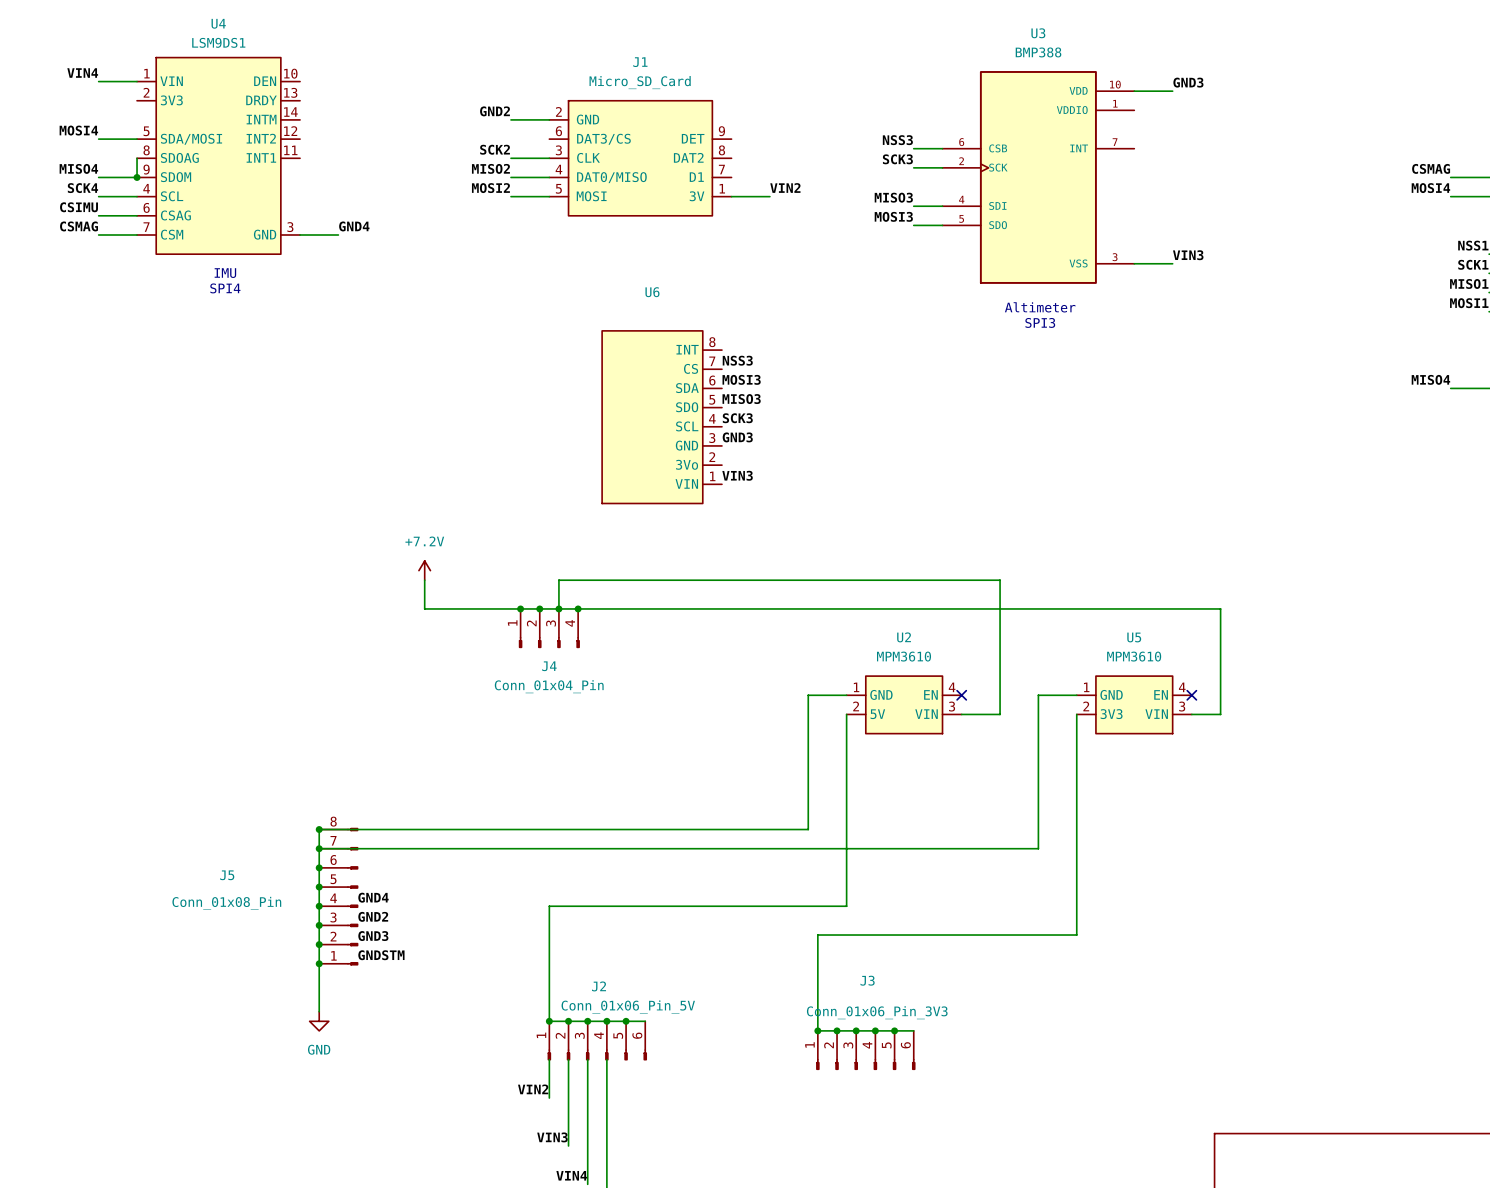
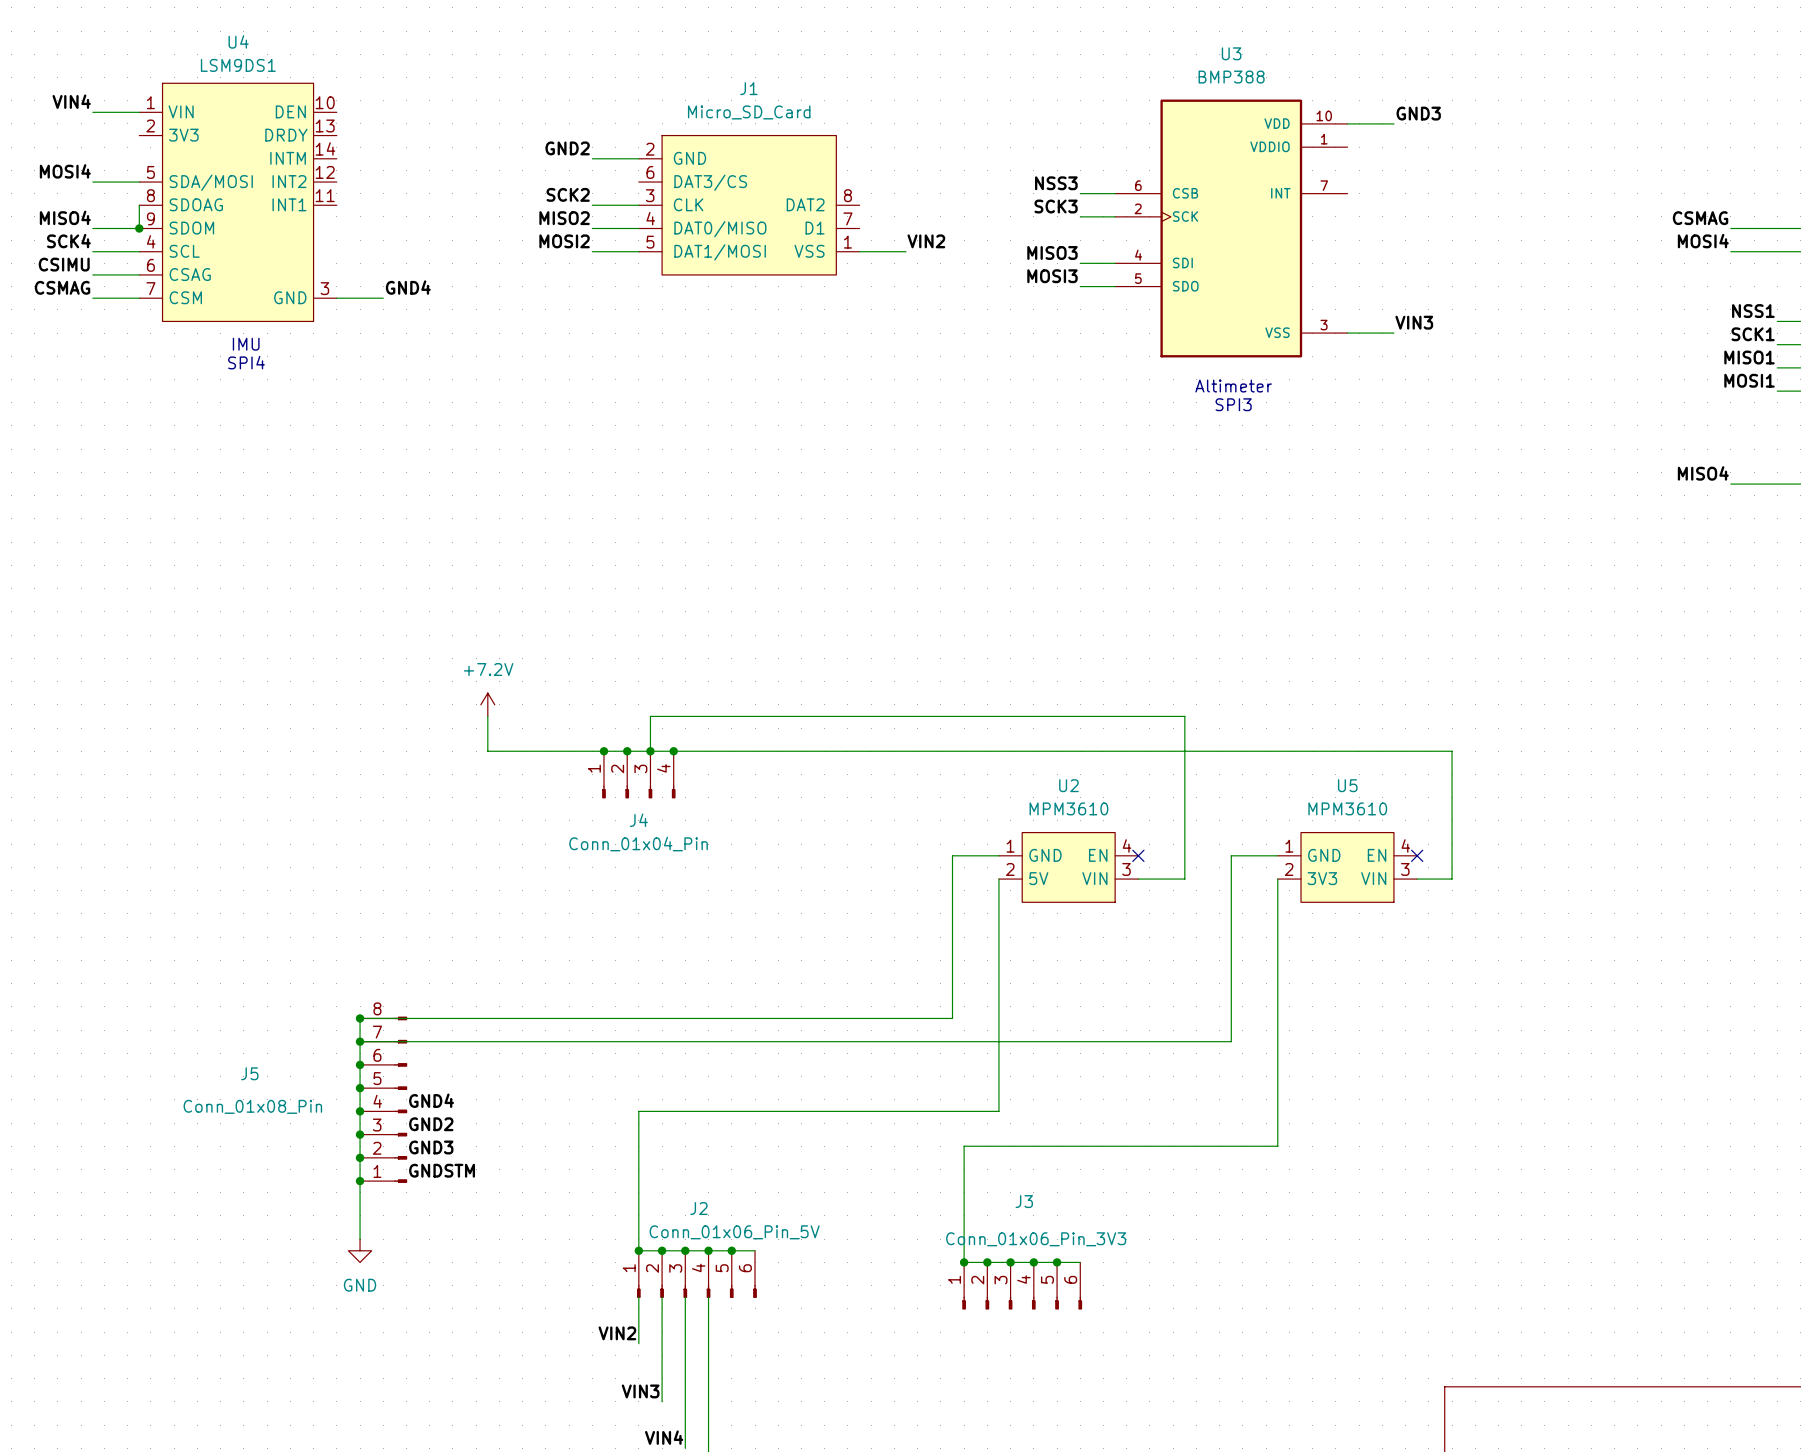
J1 symbol: [549, 100, 732, 216] -> [638, 135, 860, 275]
label: NSS3 (737, 360) -> none
label: MOSI3 (741, 379) -> none
label: MISO3 (741, 399) -> none
U6: (662, 417) -> none
label: SCK3 (737, 418) -> none
label: GND3 (737, 437) -> none
label: VIN3 (737, 475) -> none

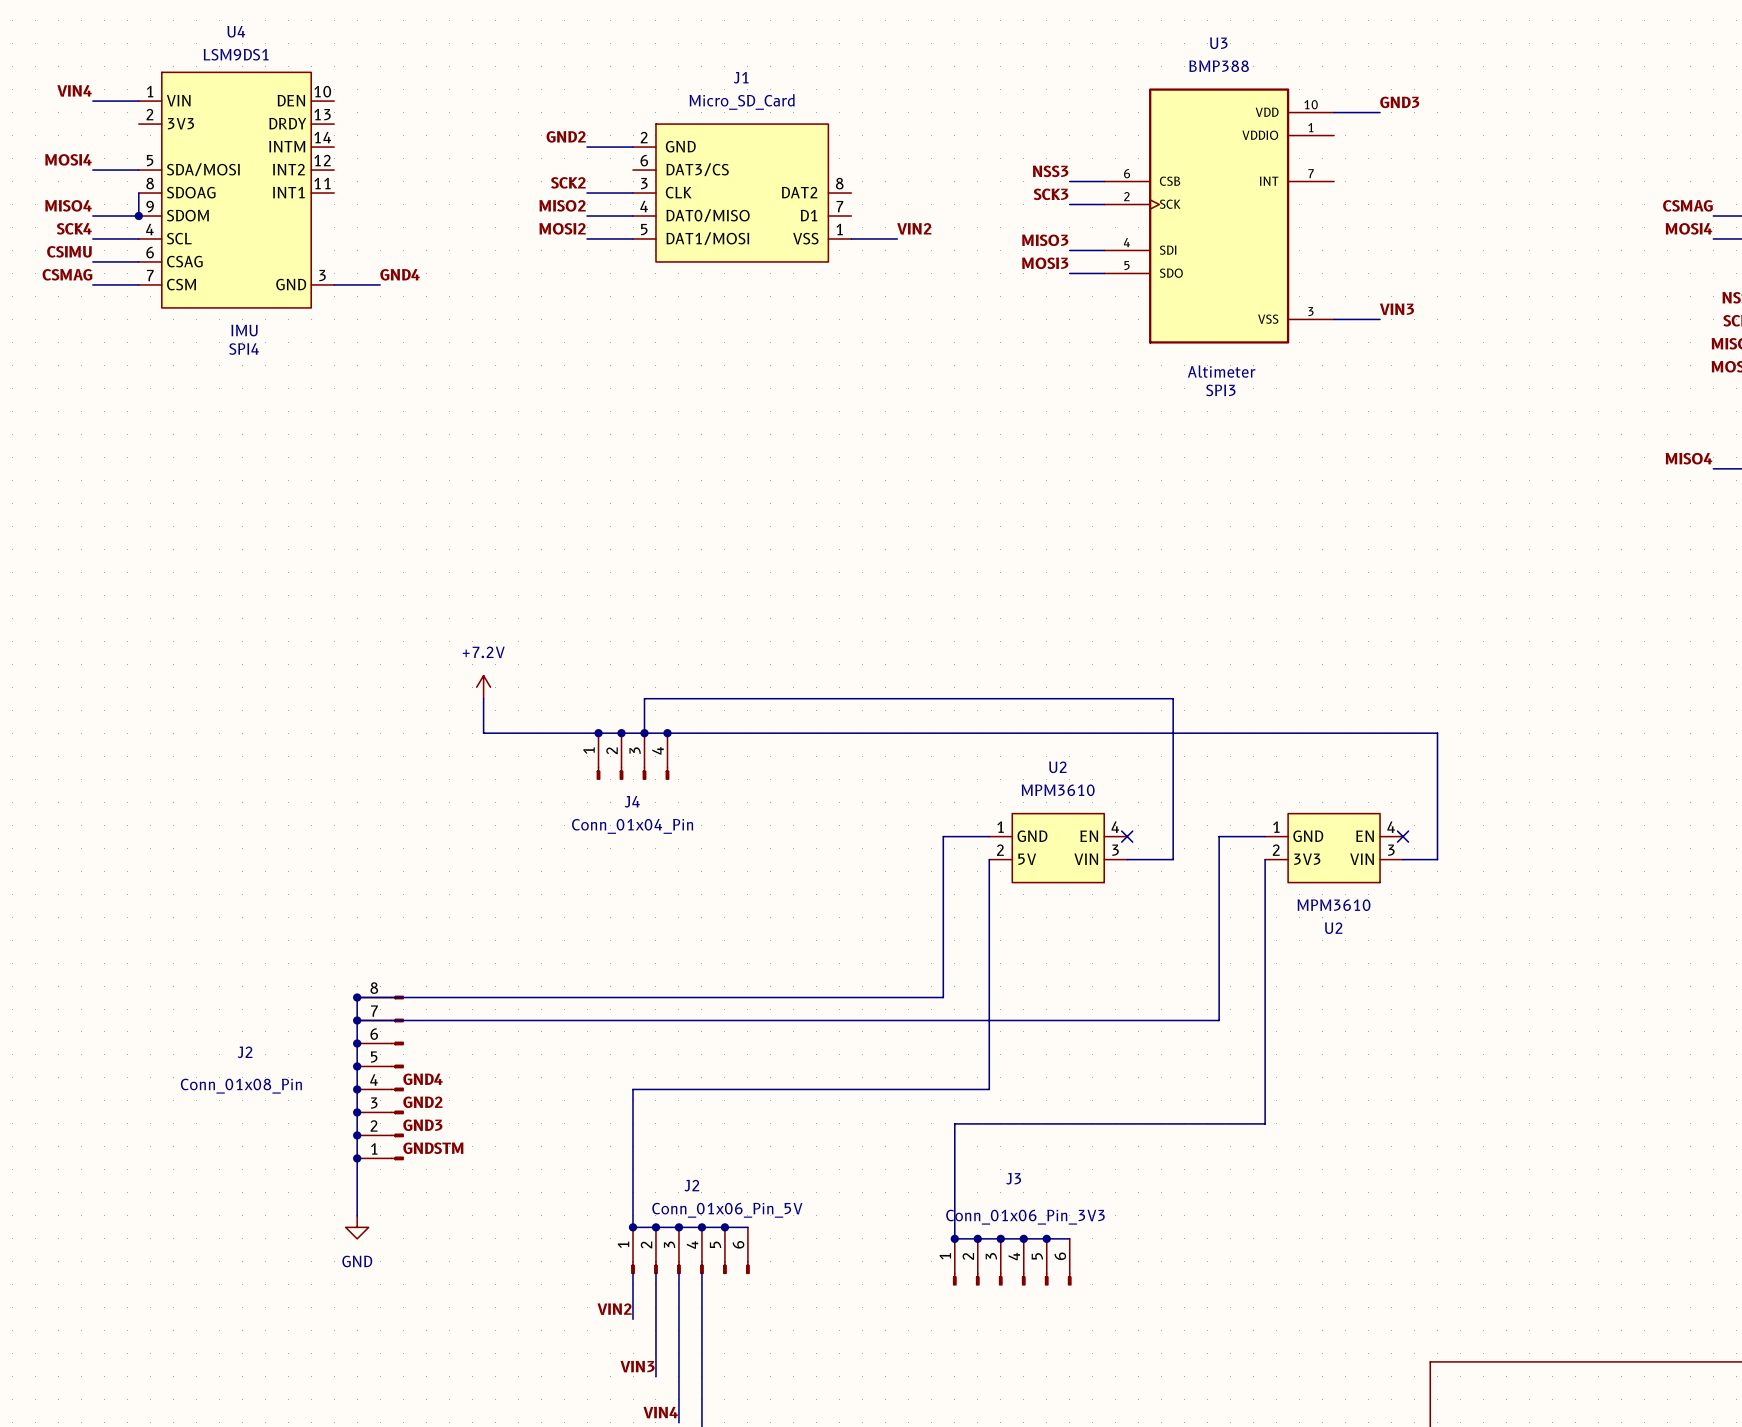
U5 name: U5 (1347, 785) -> U2 (1333, 928)
U5 value position: MPM3610 (1347, 808) -> MPM3610 (1333, 905)
J5 name: J5 (249, 1073) -> J2 (245, 1052)

